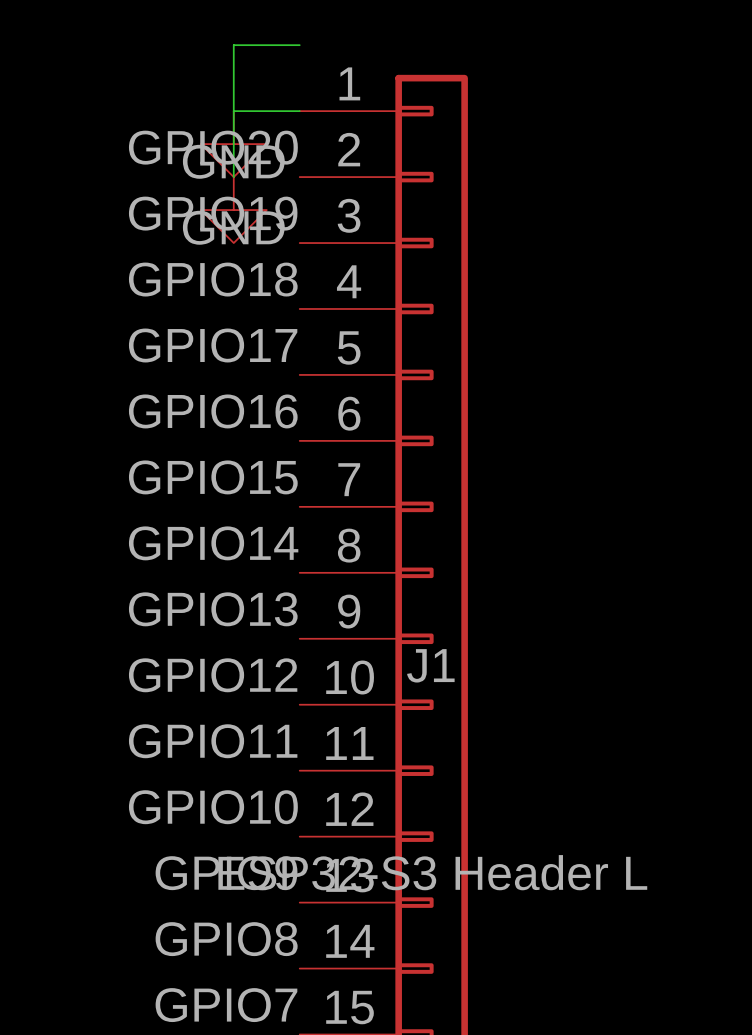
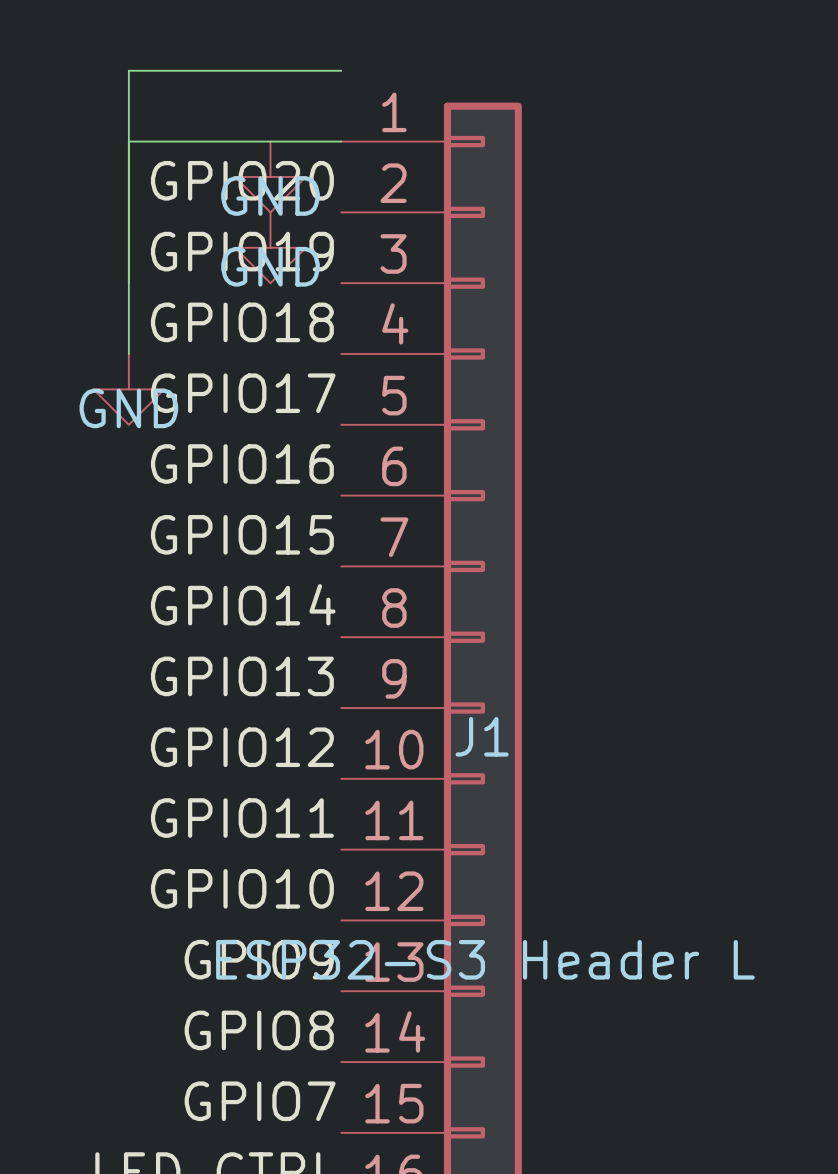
wire: (233, 45) (233, 177) -> (270, 70) (128, 70) (128, 353)
wire: none -> (128, 141) (270, 141)
power symbol: none -> GND (128, 389)

